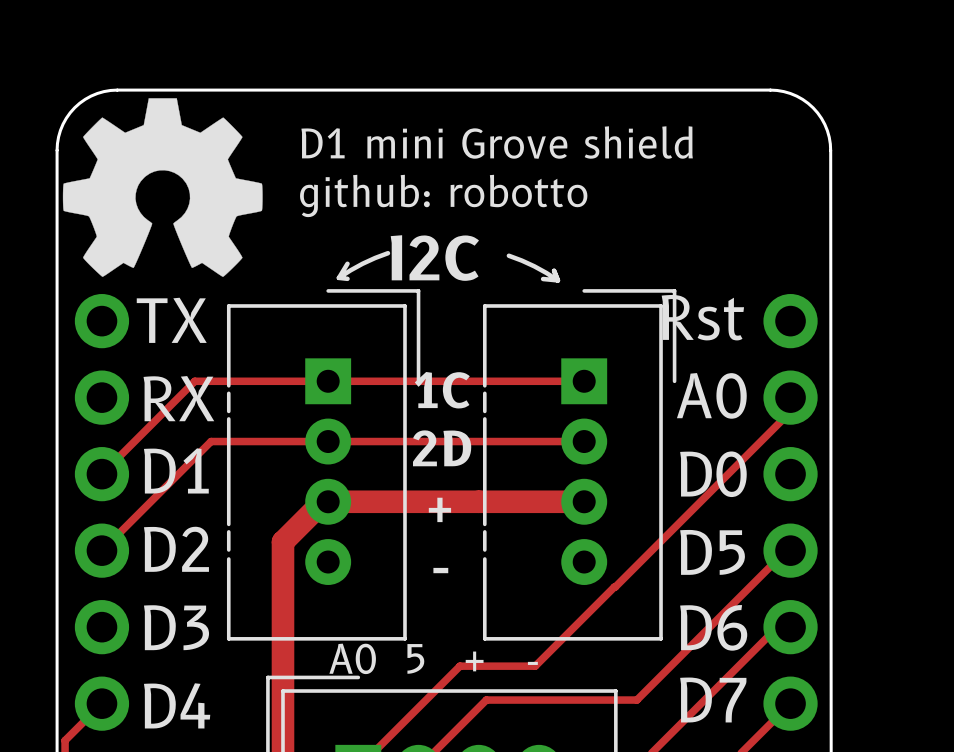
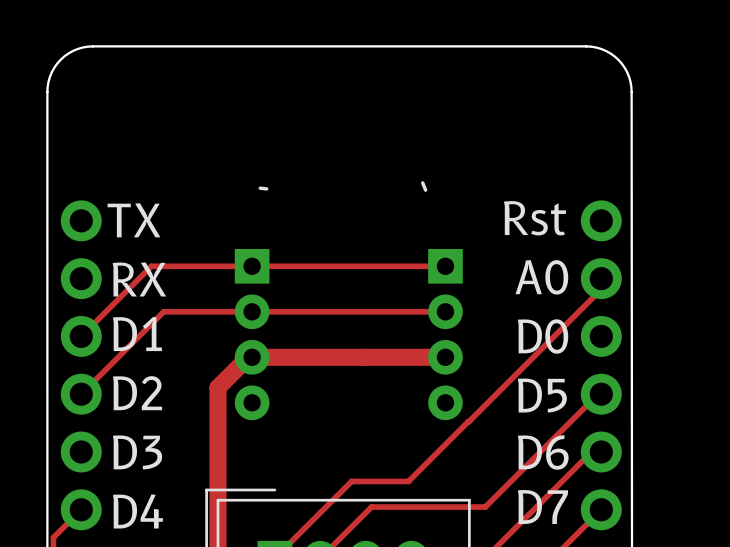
drawing: [62, 98, 263, 277] -> none
text: D1 mini Grove shield (497, 142) -> none
text: github: robotto (443, 195) -> none
line: (387, 253) (362, 263) (338, 277) (347, 263) -> none
line: (508, 255) (534, 266) (557, 280) (543, 279) -> none
text: I2C (434, 258) -> none
text: 1C (442, 390) -> none
text: 2D (442, 448) -> none
part side: top (323, 464) -> bottom (252, 334)
part side: top (579, 464) -> bottom (445, 334)
text: + (439, 509) -> none
text: - (440, 570) -> none
text: A0 (352, 658) -> none
text: 5 (415, 658) -> none
text: + (474, 661) -> none
text: - (532, 663) -> none

